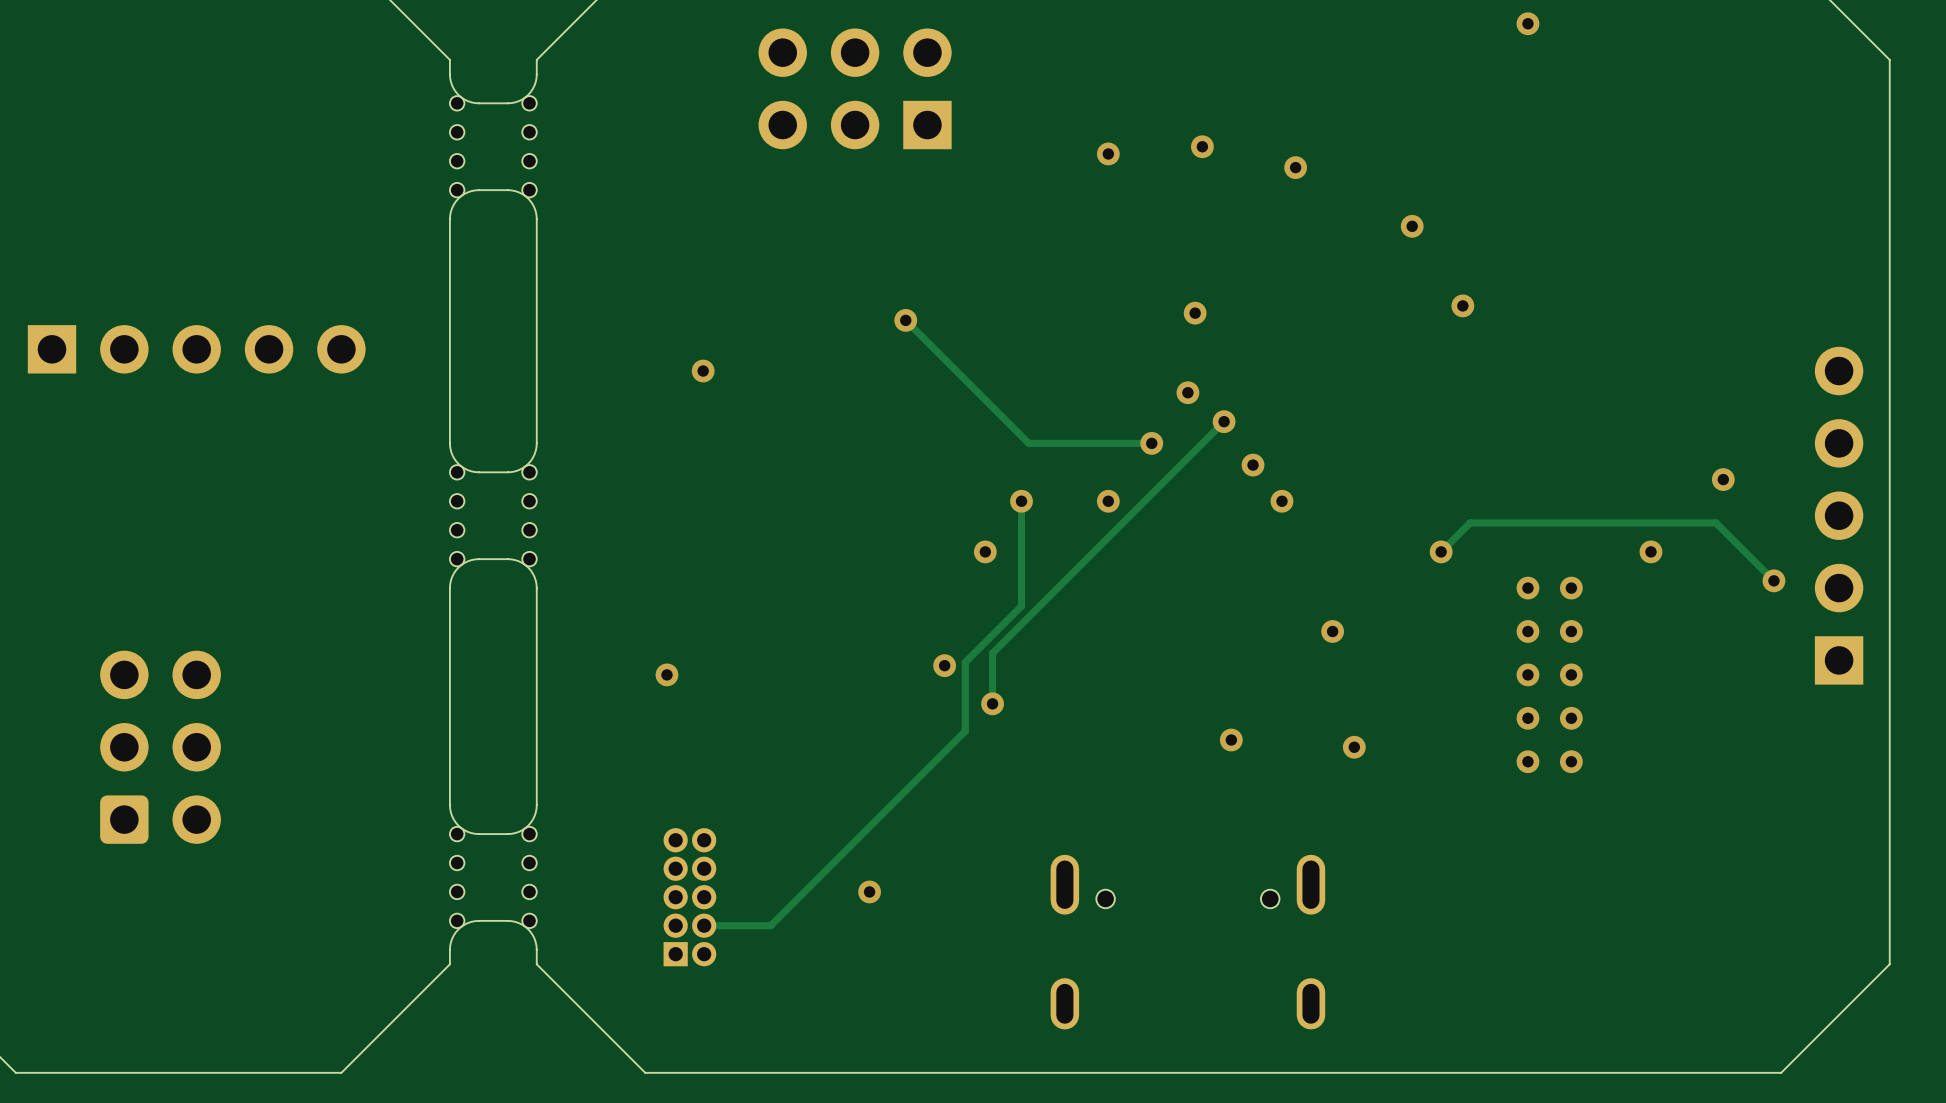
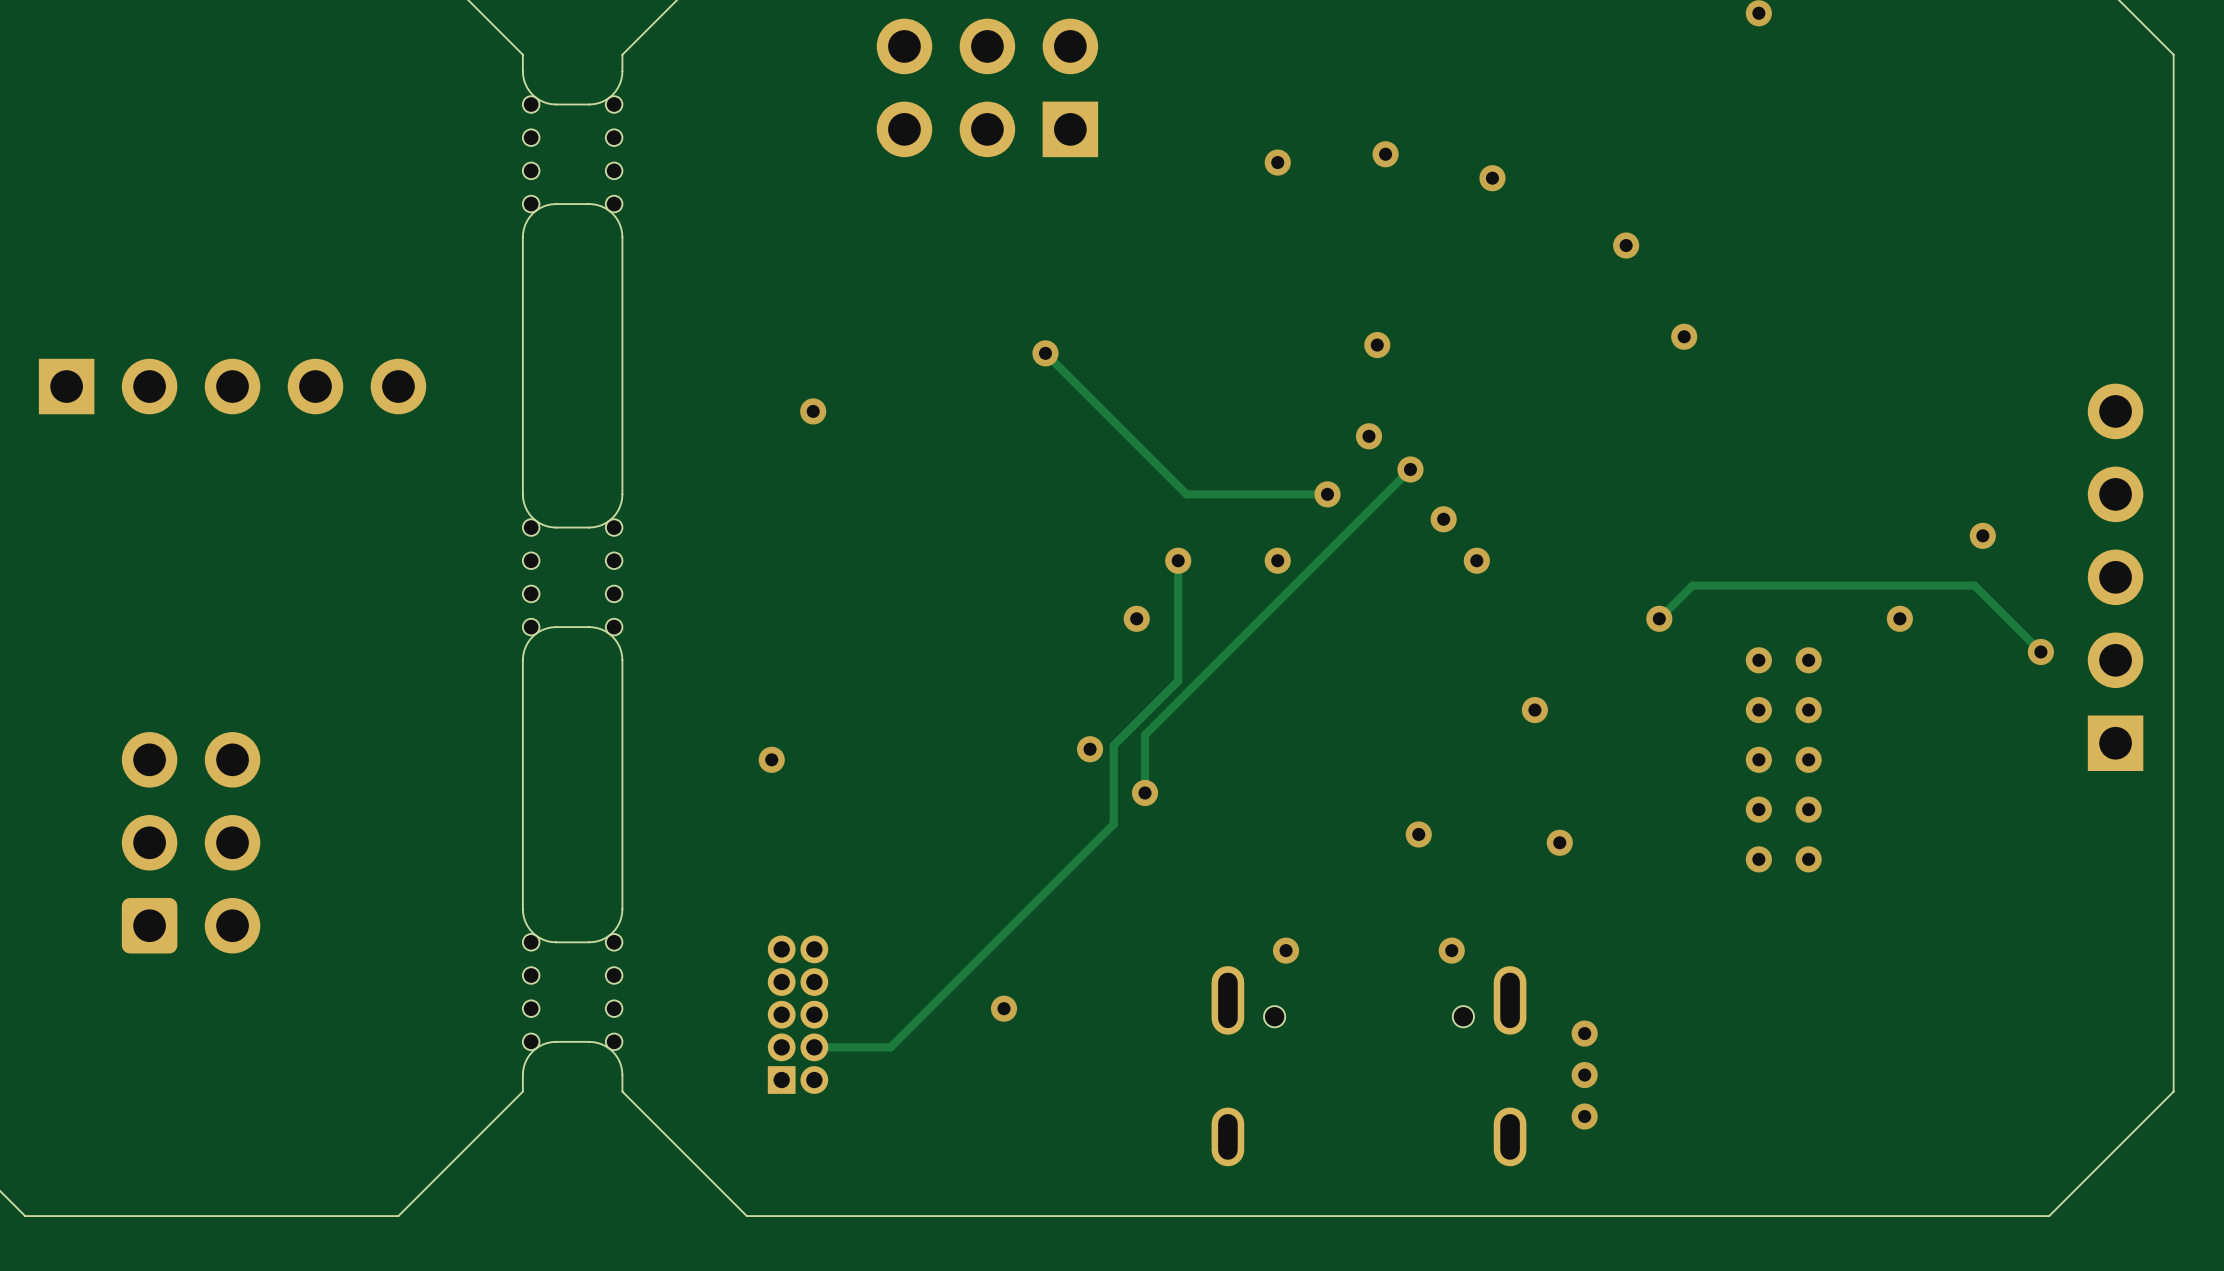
via: none -> (1286, 950)
via: none -> (1451, 950)
via: none -> (1584, 1033)
via: none -> (1584, 1075)
via: none -> (1584, 1116)

